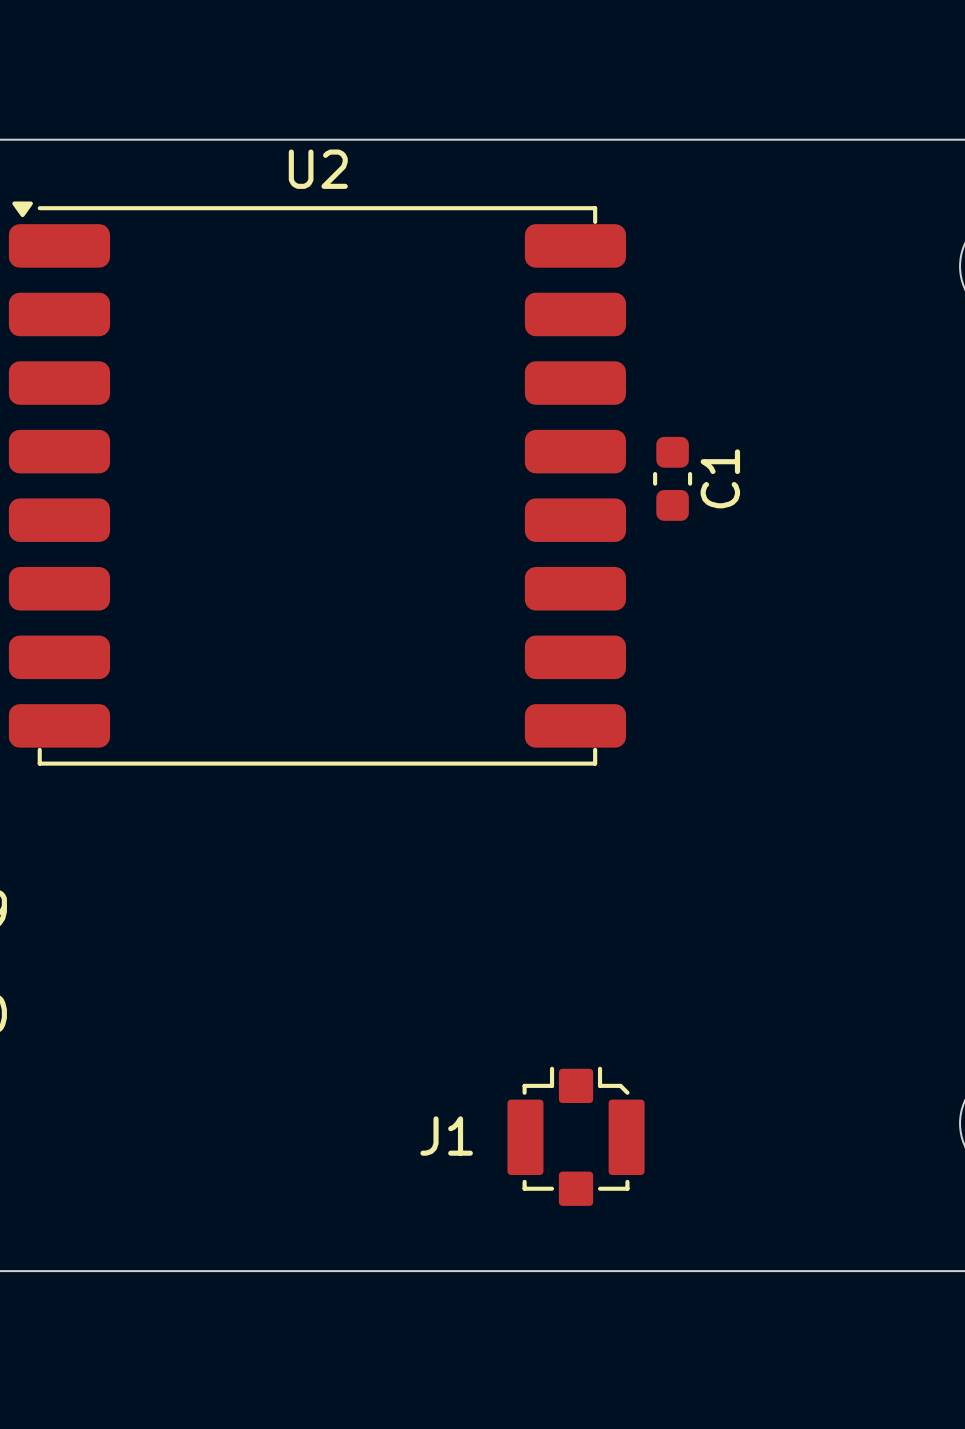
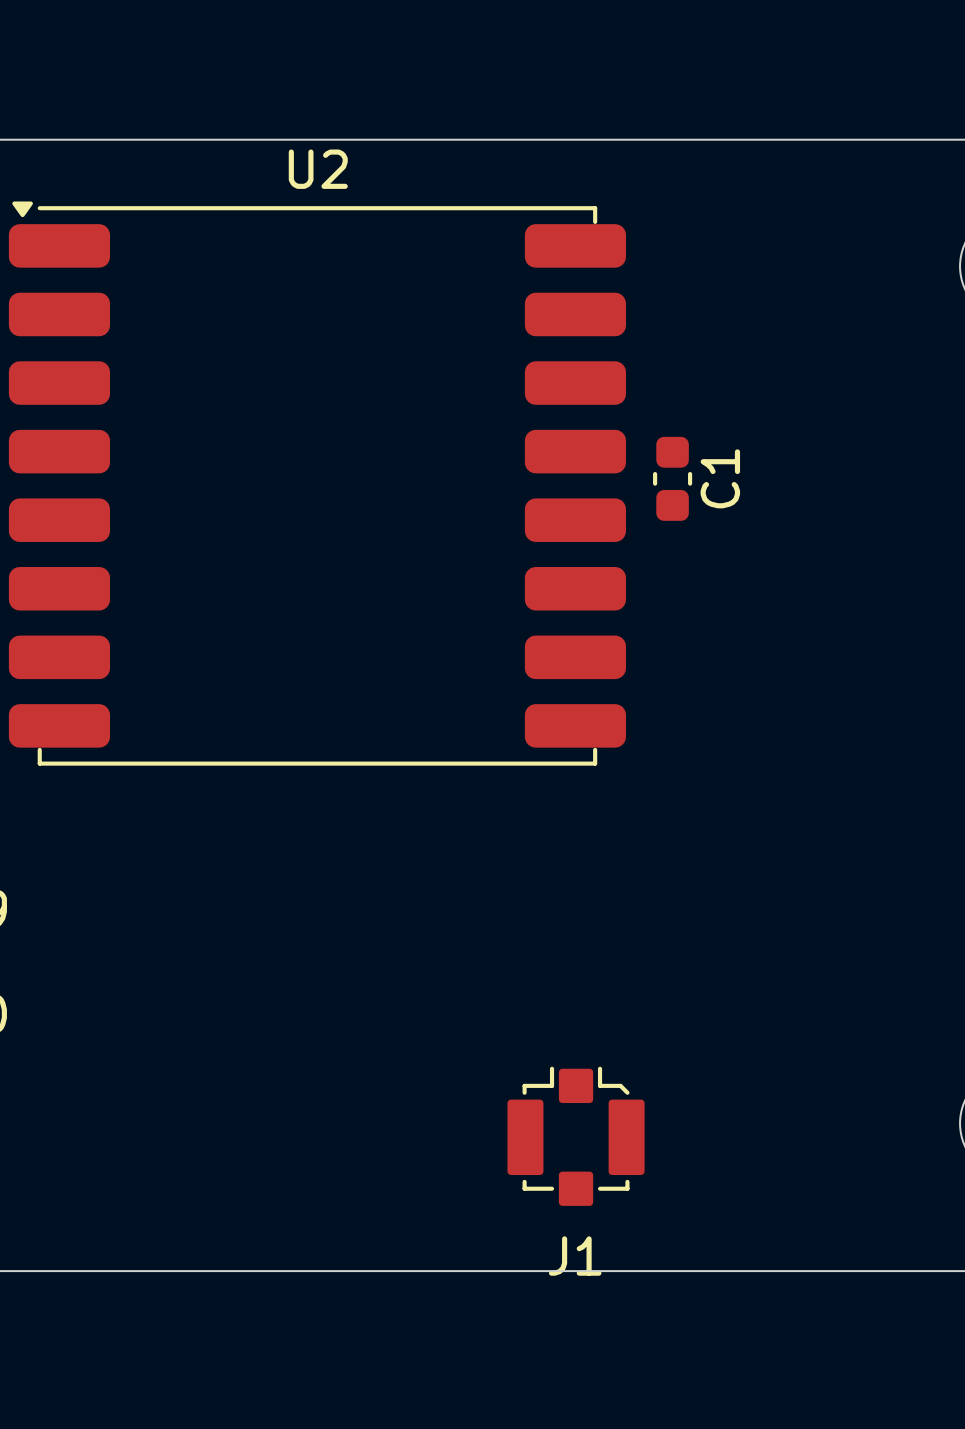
J1 name position: J1 (446, 1136) -> J1 (575, 1256)

